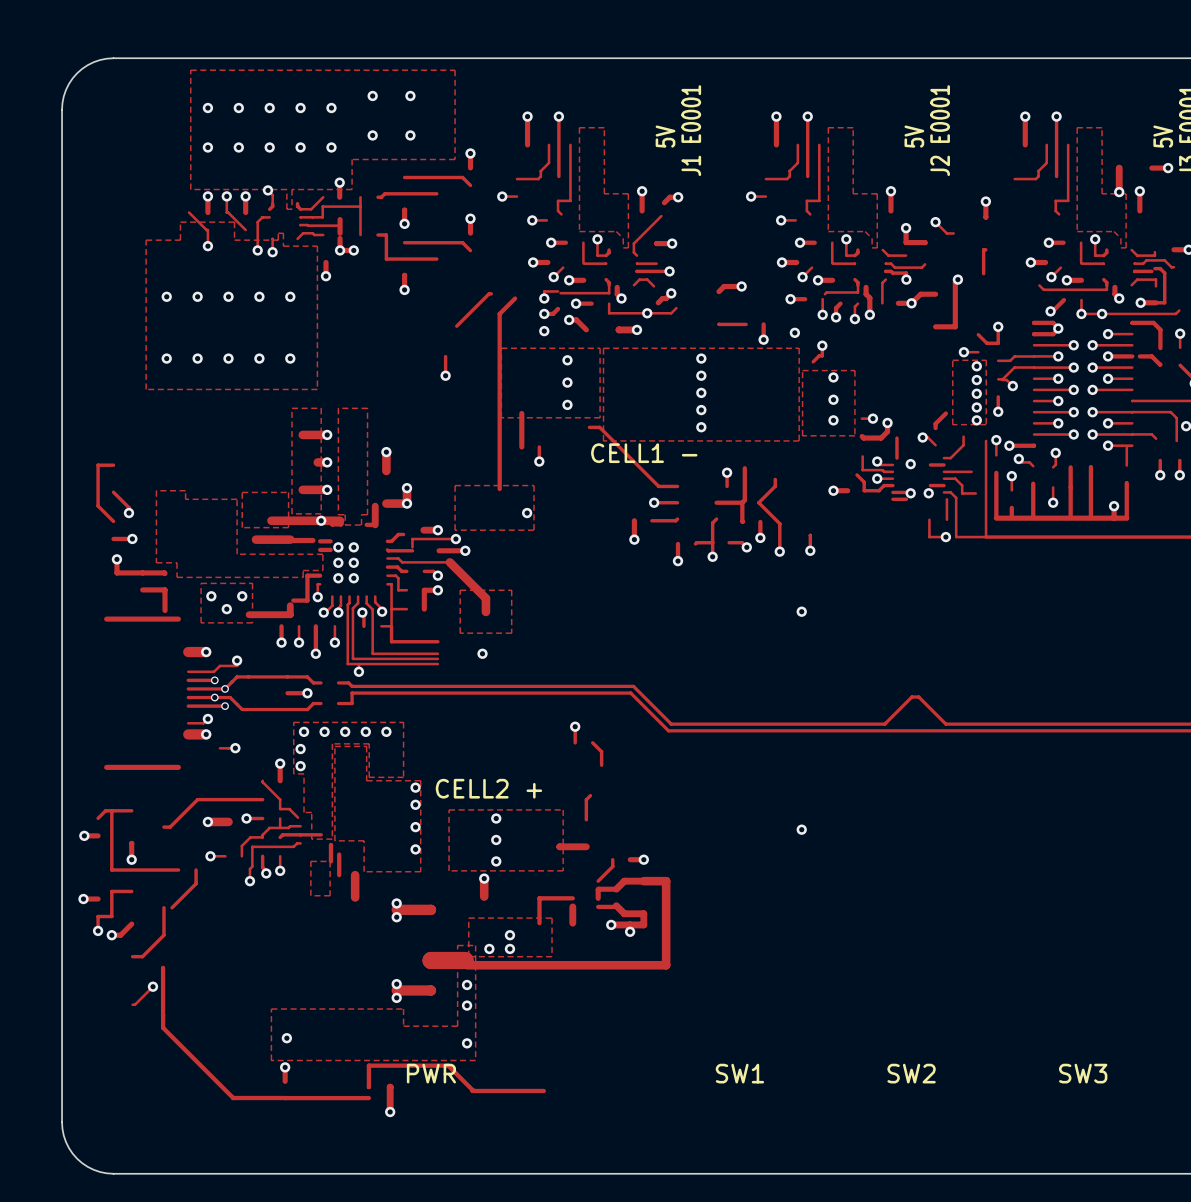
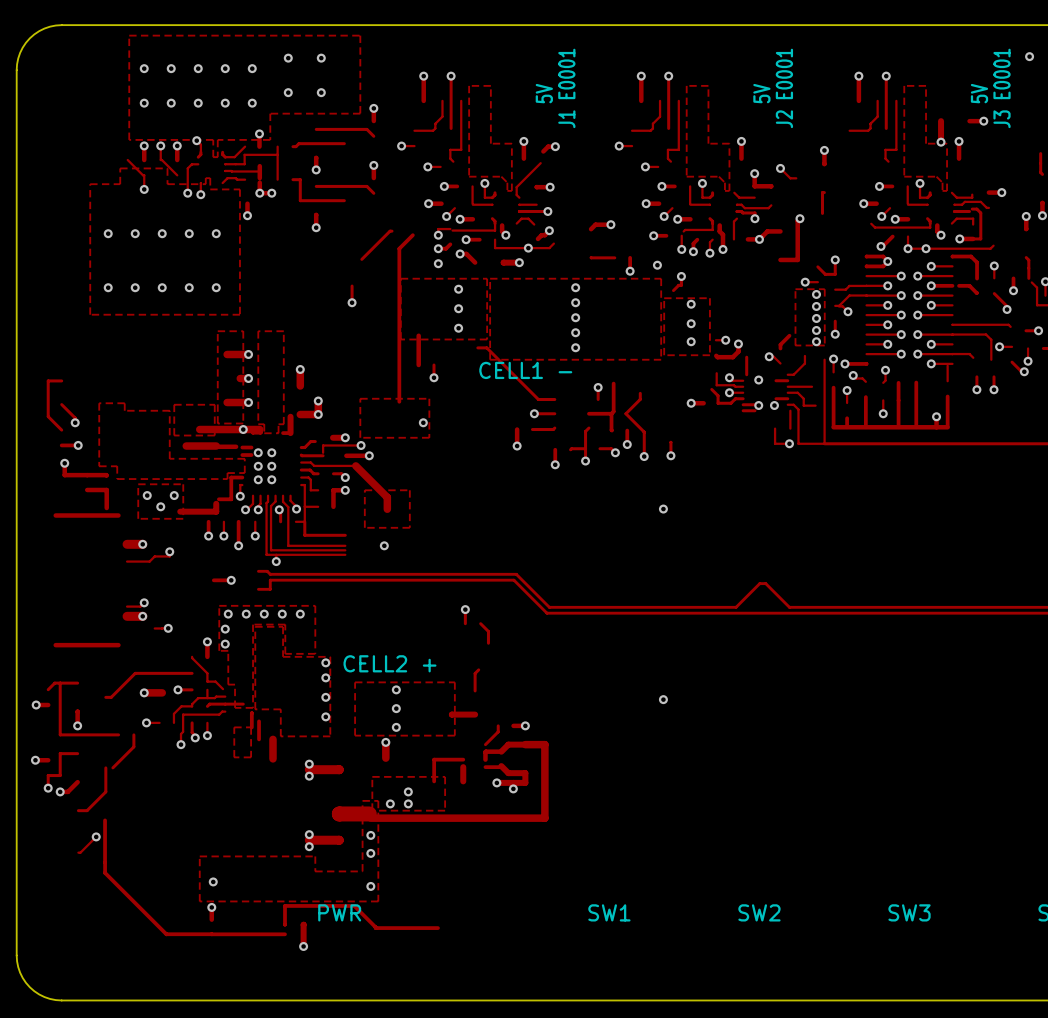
track: (188, 680) (214, 680) -> none
via: (214, 680) -> none
track: (321, 682) (313, 682) (307, 676) (237, 676) (225, 688) (188, 688) -> none
via: (225, 688) -> none
track: (188, 697) (230, 697) (242, 709) (307, 709) (313, 703) (321, 703) -> none
via: (214, 697) -> none
track: (188, 706) (225, 706) -> none
via: (225, 706) -> none

